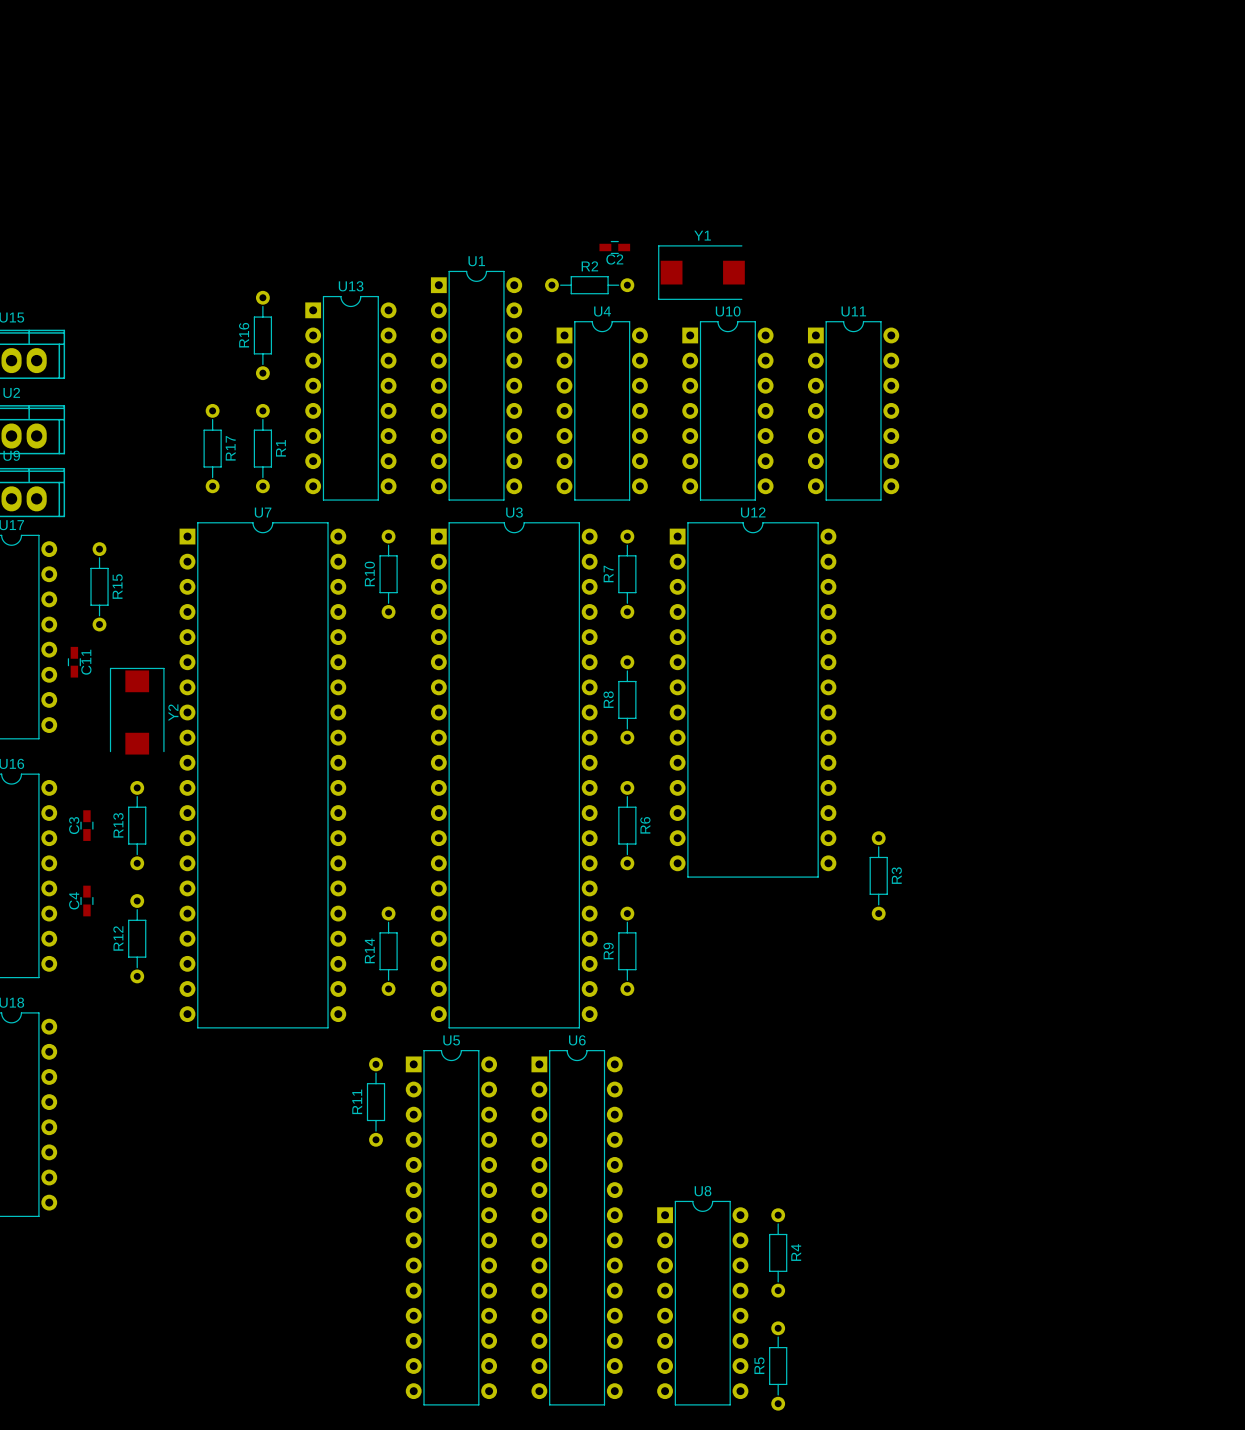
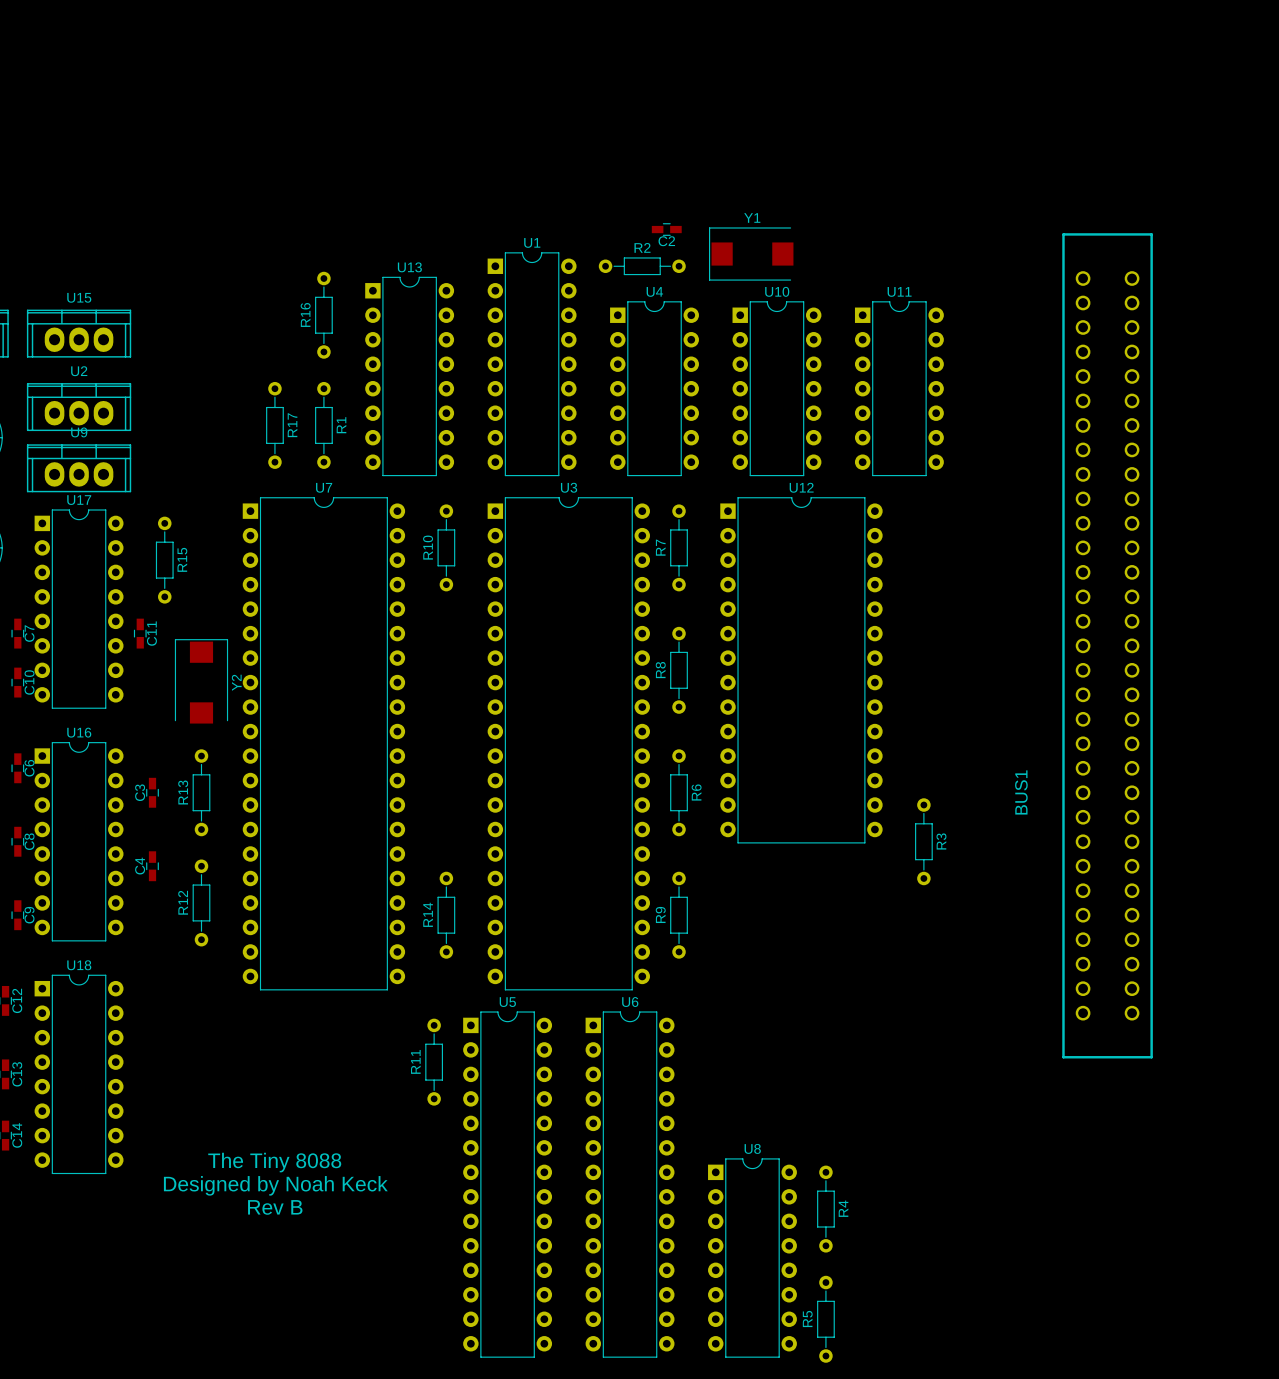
BUS1: none -> (1107, 645)
text: none -> The Tiny 8088 (274, 1162)
text: none -> Designed by Noah Keck (275, 1185)
text: none -> Rev B (275, 1207)

